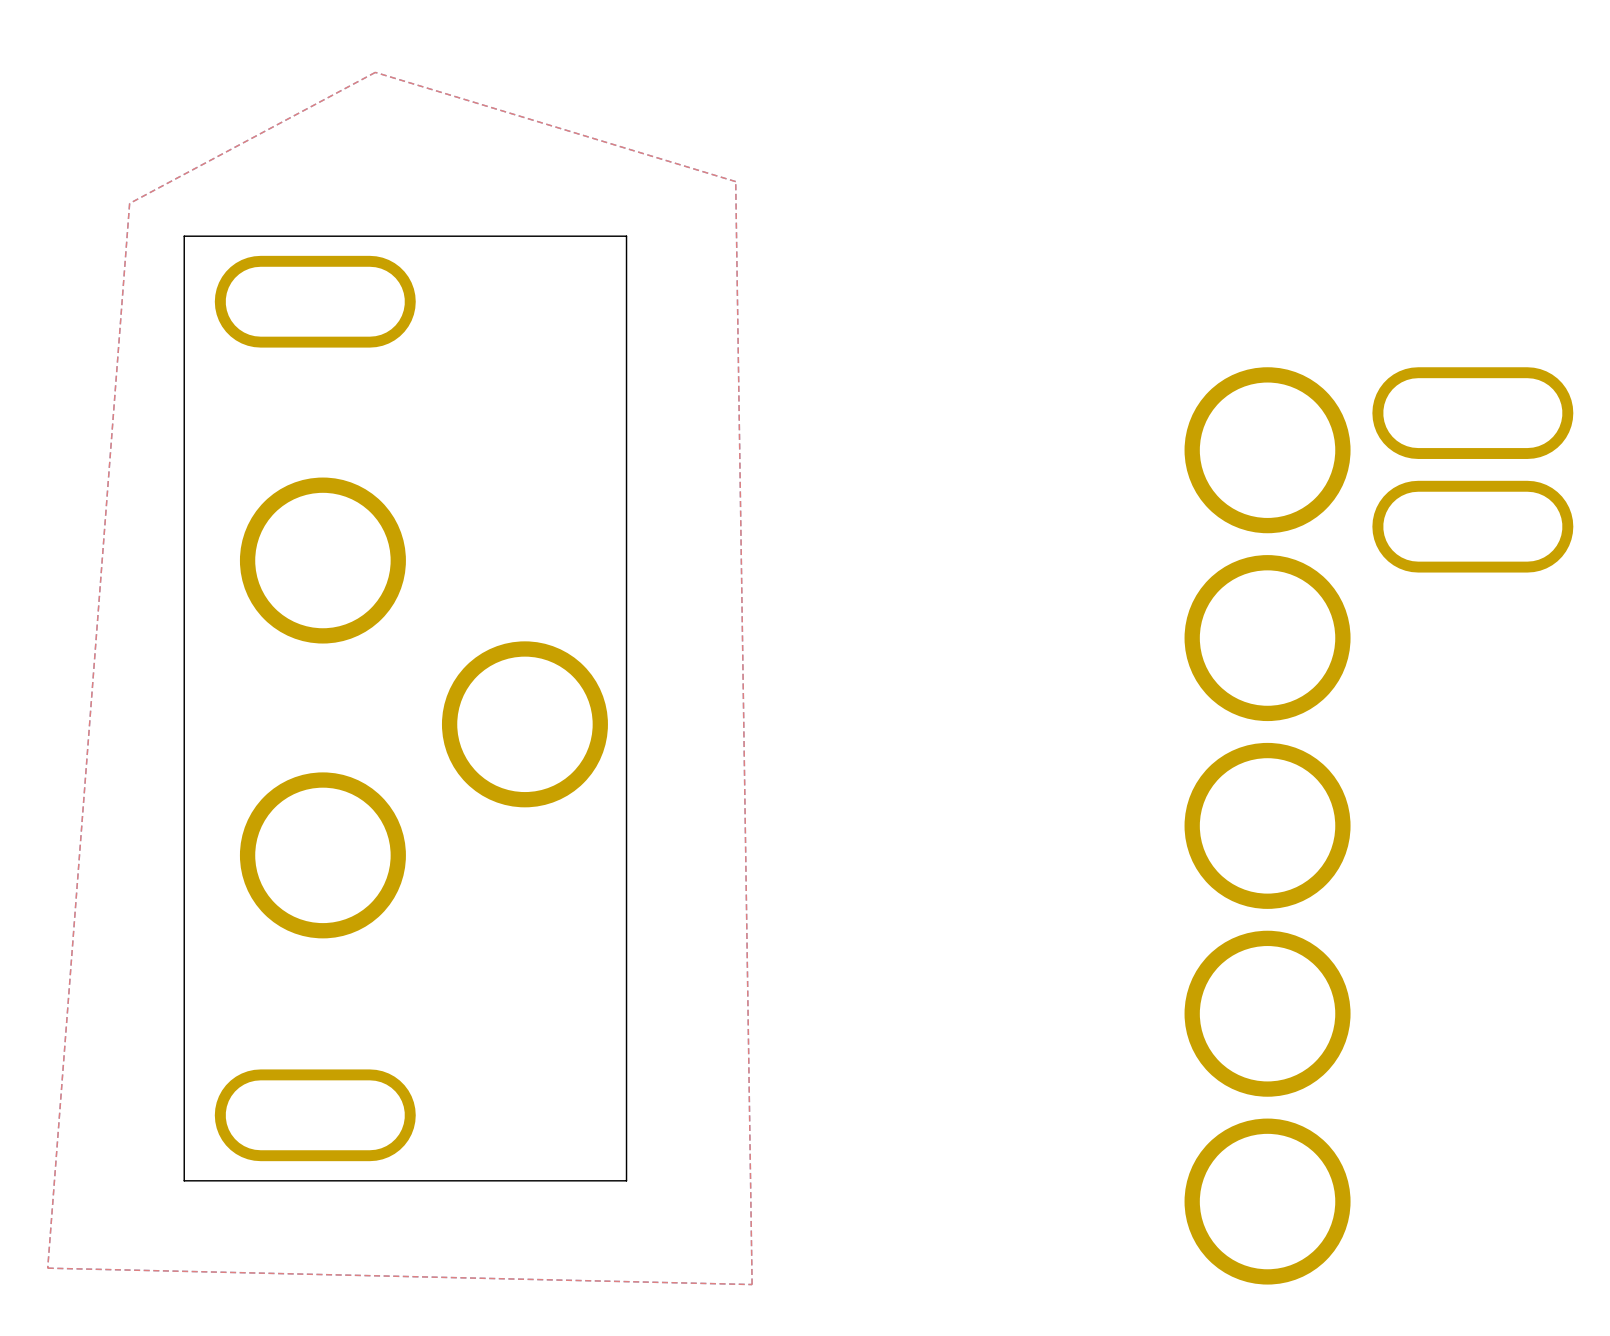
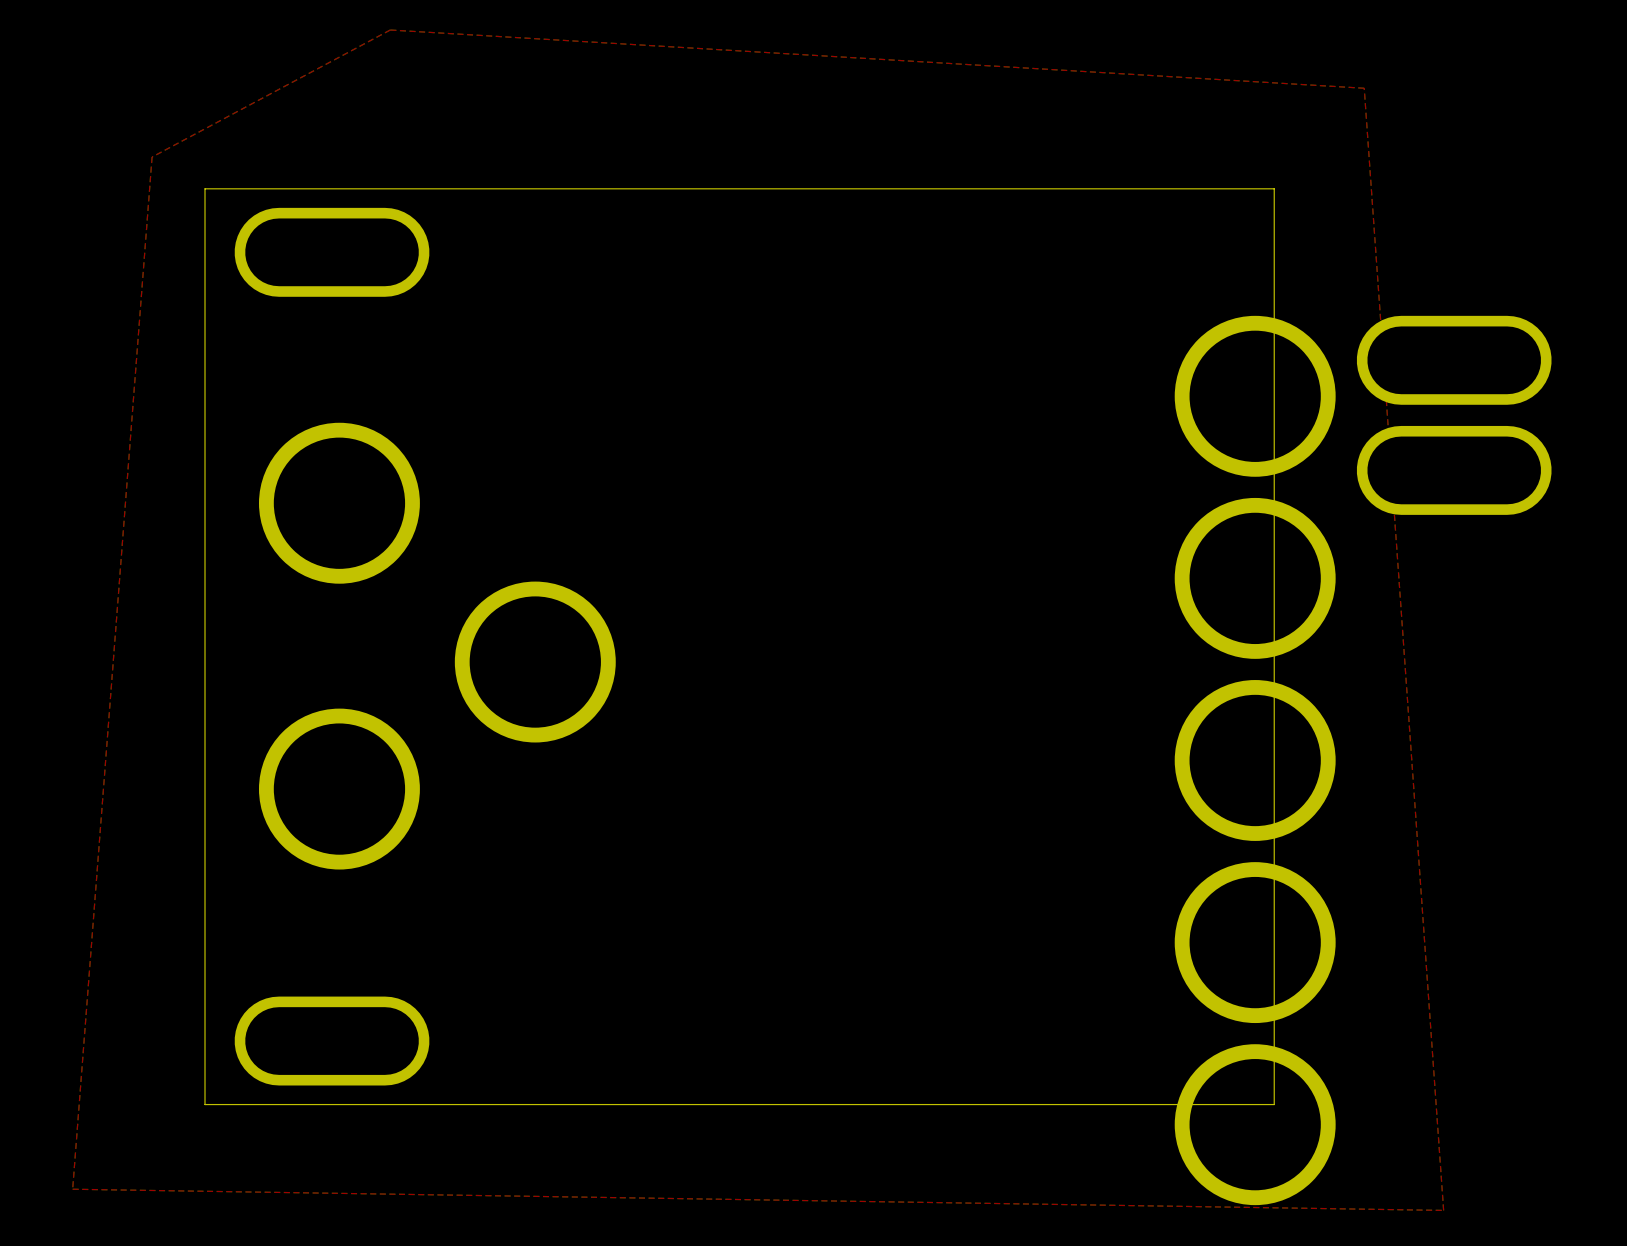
top zone outline: (375, 72) (735, 181) (752, 1284) (47, 1268) -> (390, 30) (1364, 88) (1443, 1210) (72, 1189)
board edge: (626, 236) (626, 1180) -> (633, 188) (1274, 188) (1274, 1104) (633, 1104)

